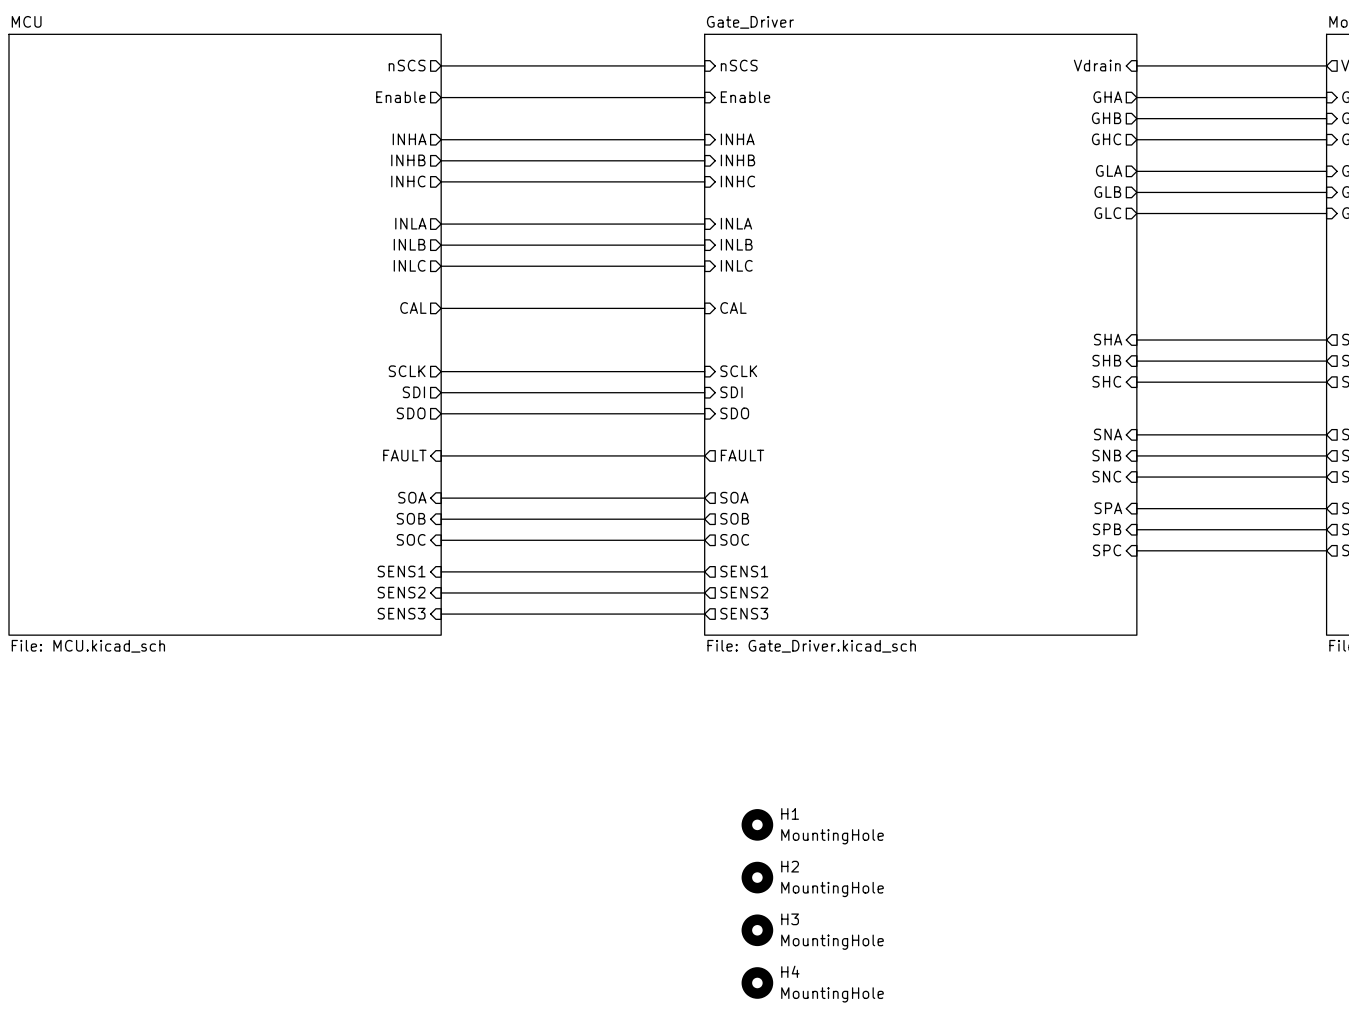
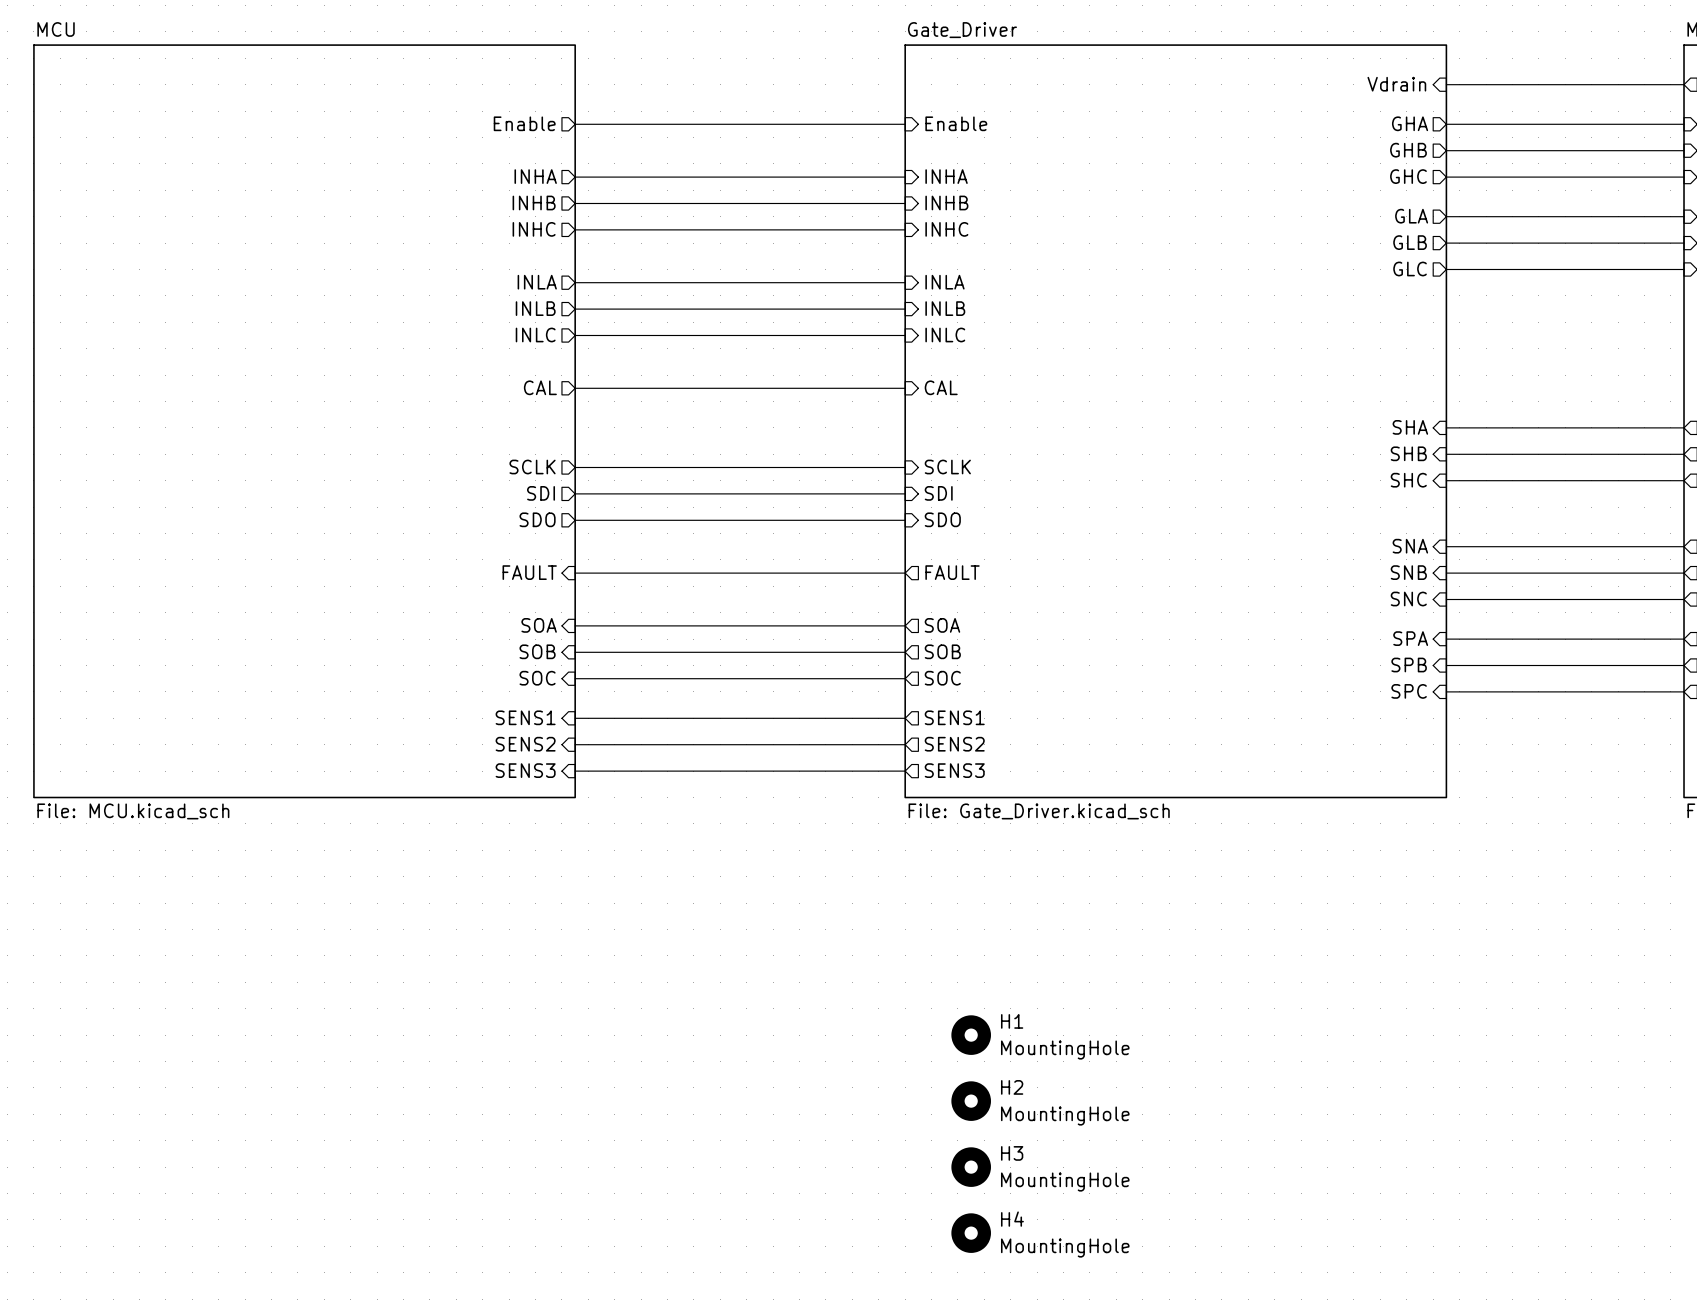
sheet pin: nSCS (407, 65) -> none
wire: (441, 65) (704, 65) -> none
sheet pin: nSCS (739, 65) -> none

